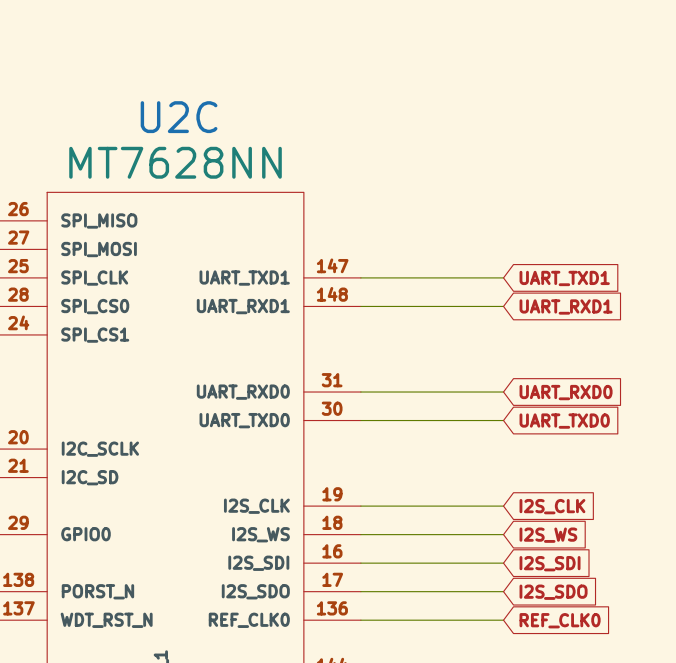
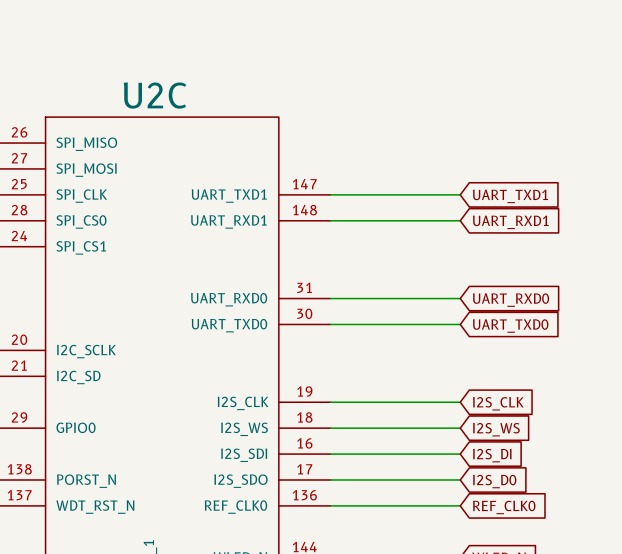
U2C name position: U2C (179, 117) -> U2C (155, 95)
U2C value: MT7628NN (175, 162) -> none
global label: I2S_SDI (550, 563) -> I2S_DI (492, 455)
global label: I2S_SDO (553, 592) -> I2S_D0 (494, 481)

